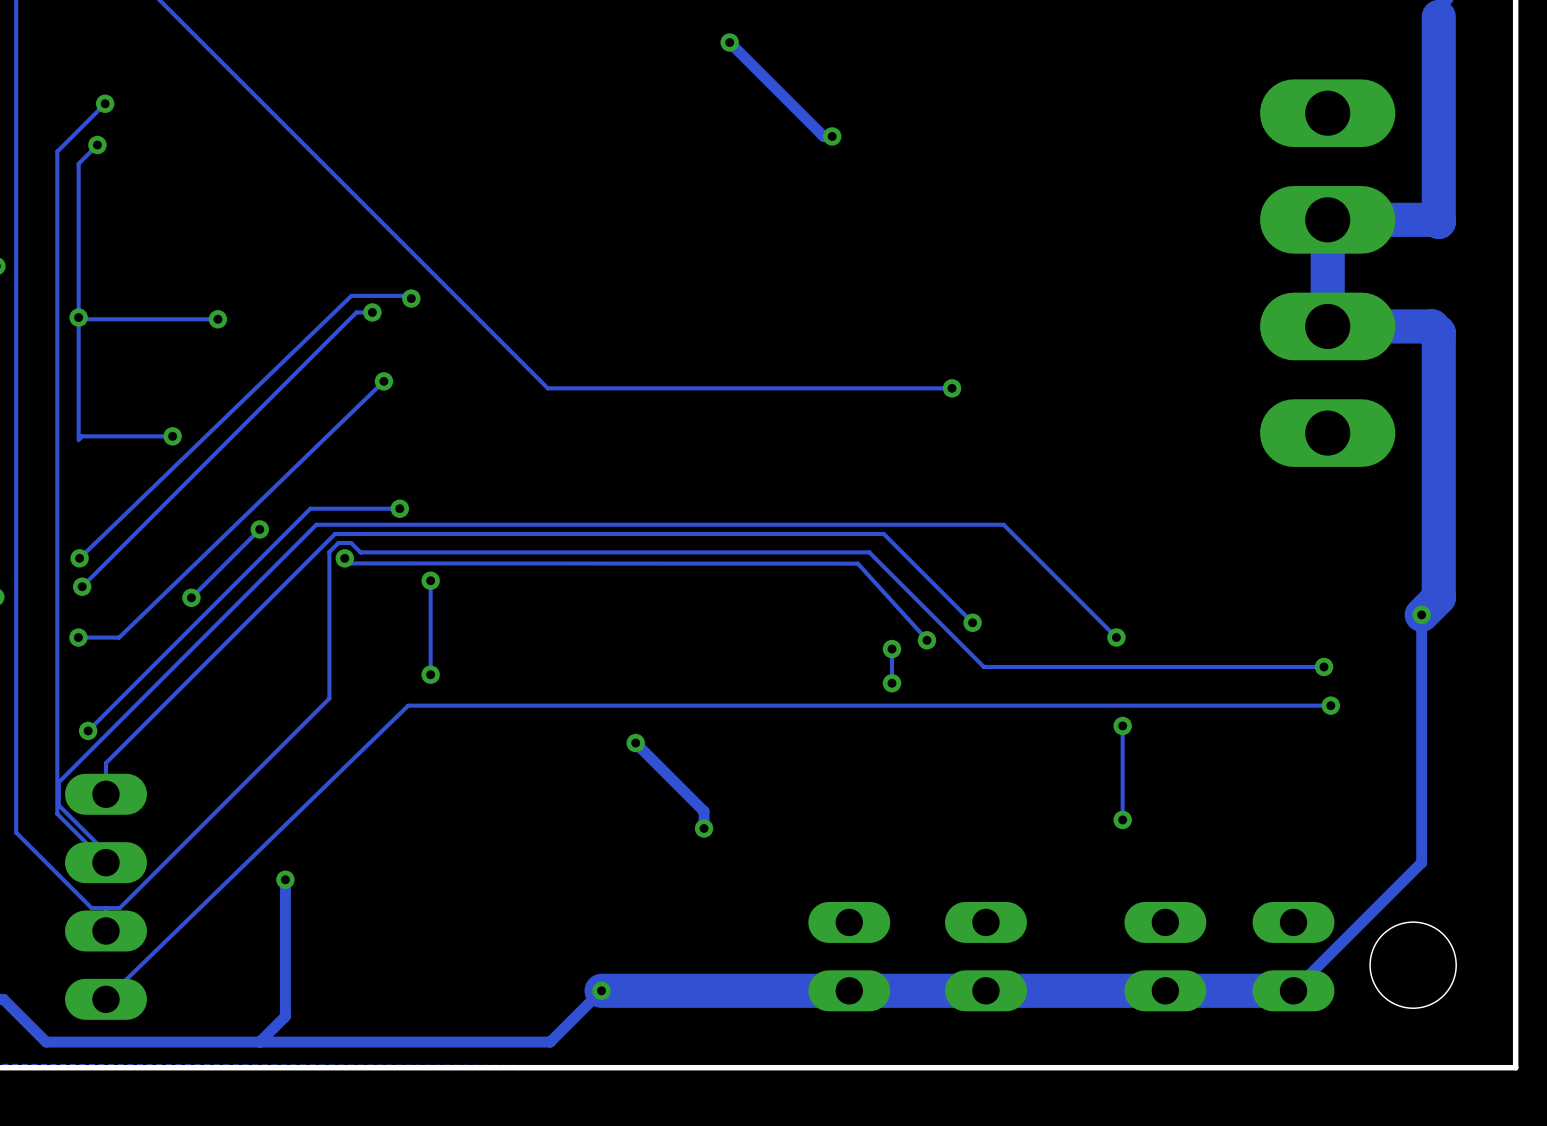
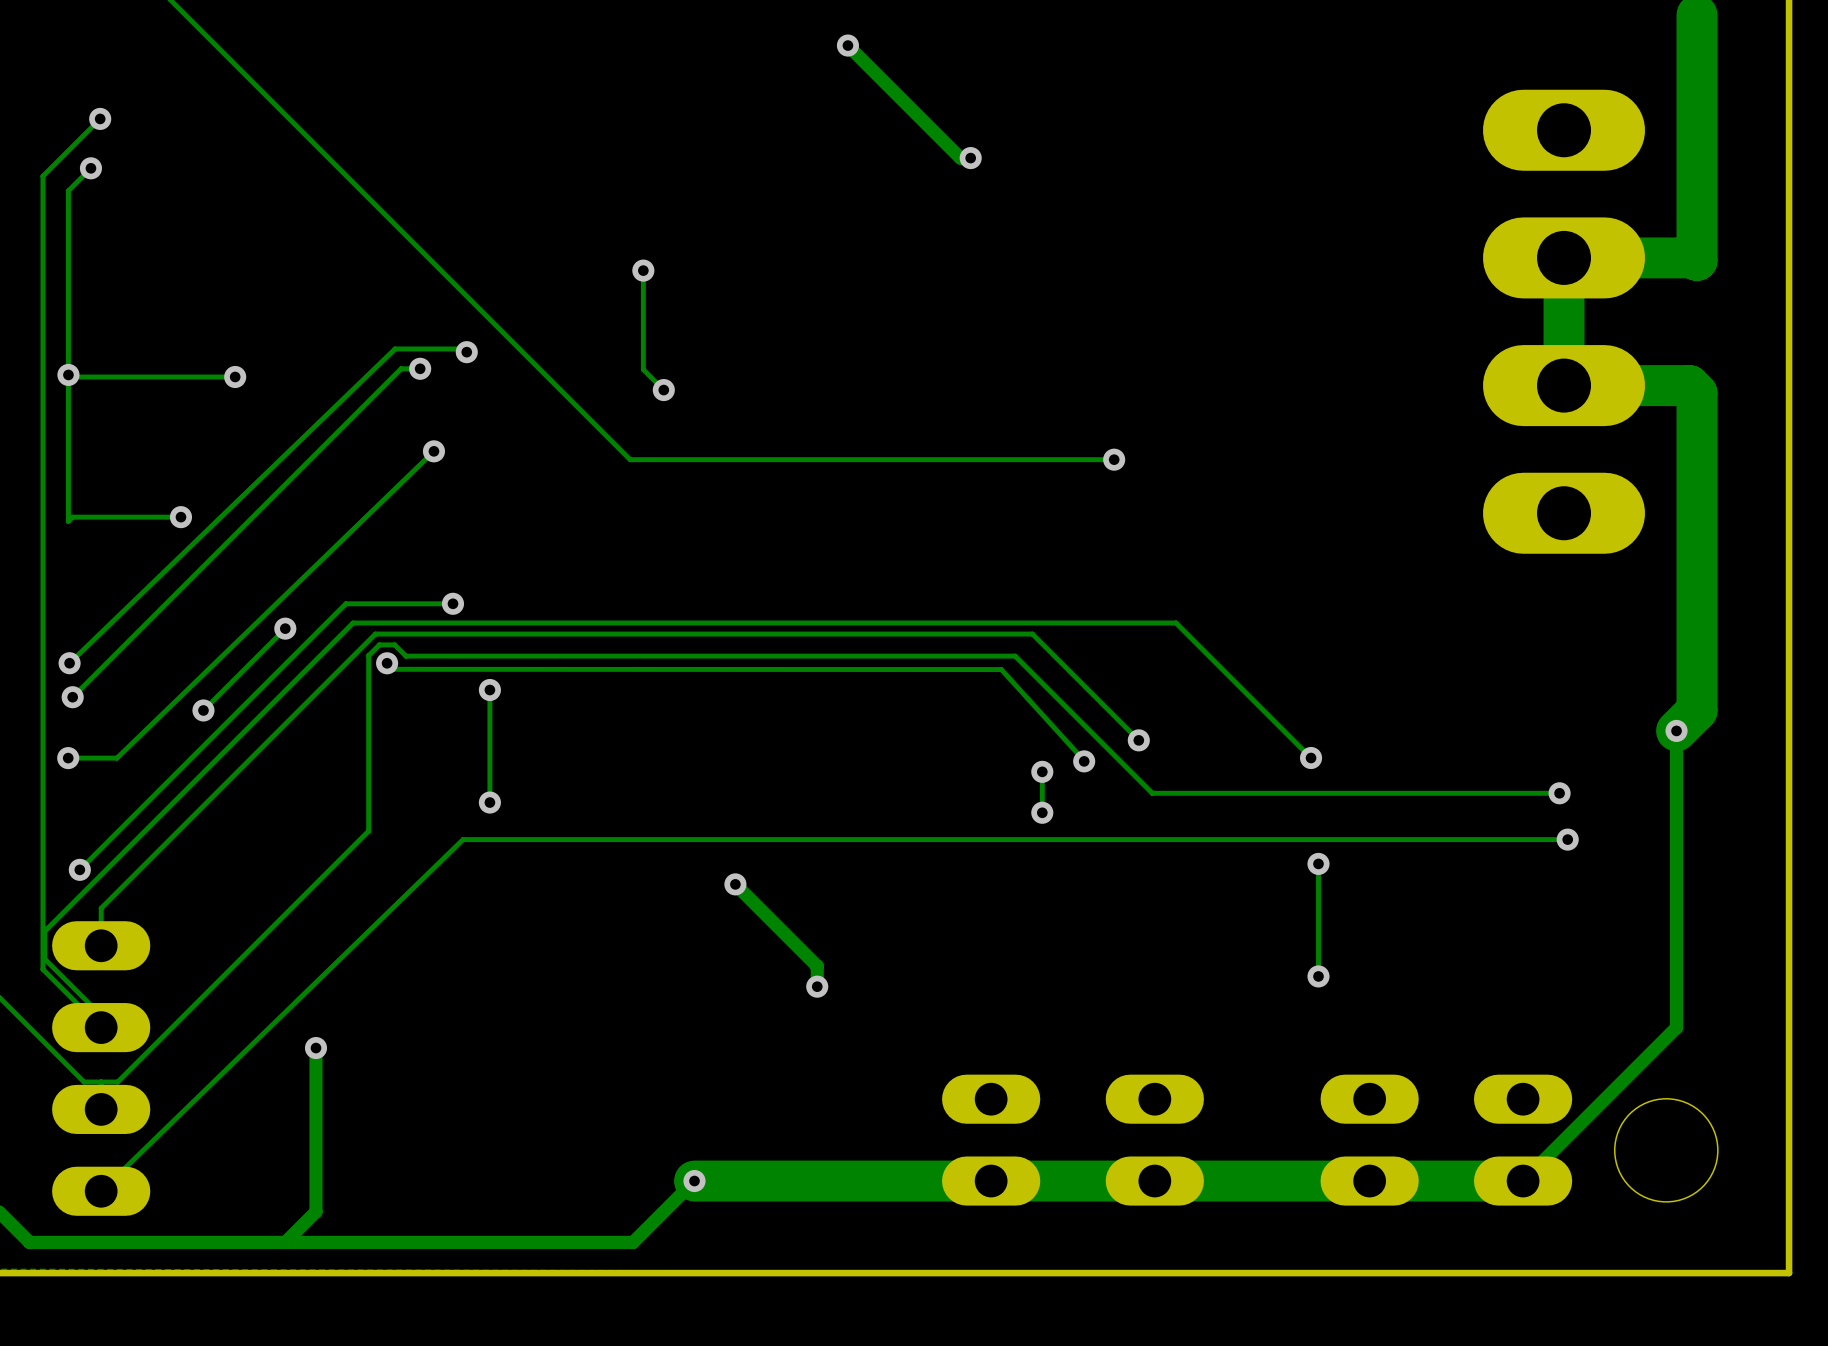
track: none -> (643, 270) (643, 369) (663, 390)
via: none -> (643, 270)
via: none -> (663, 390)

